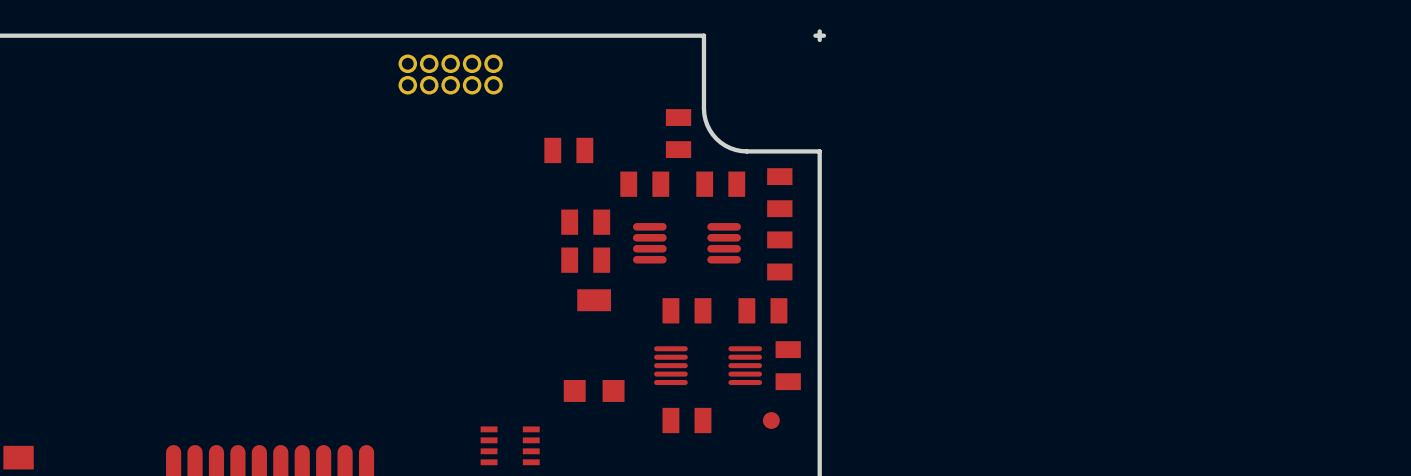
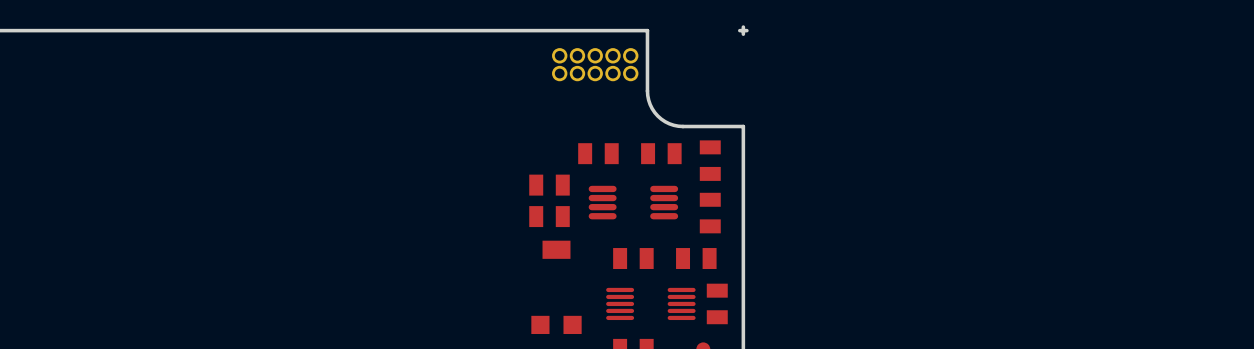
part position: (450, 74) -> (595, 64)
part: (678, 133) -> none
part: (568, 150) -> none

